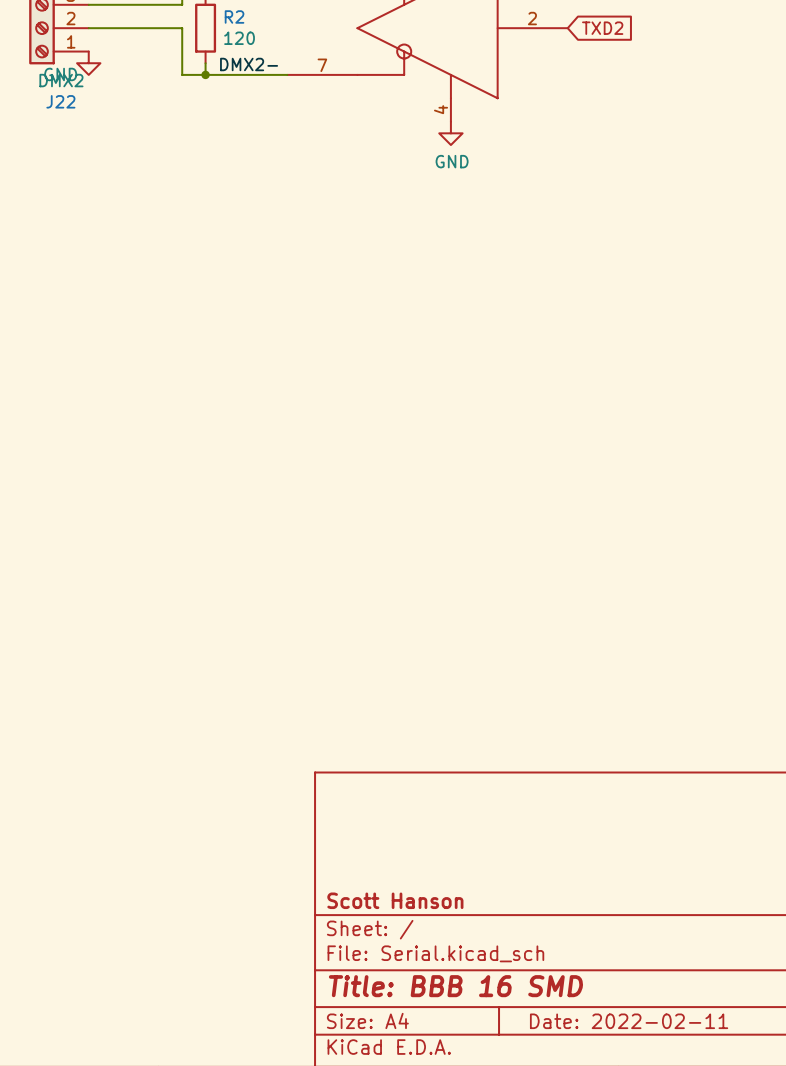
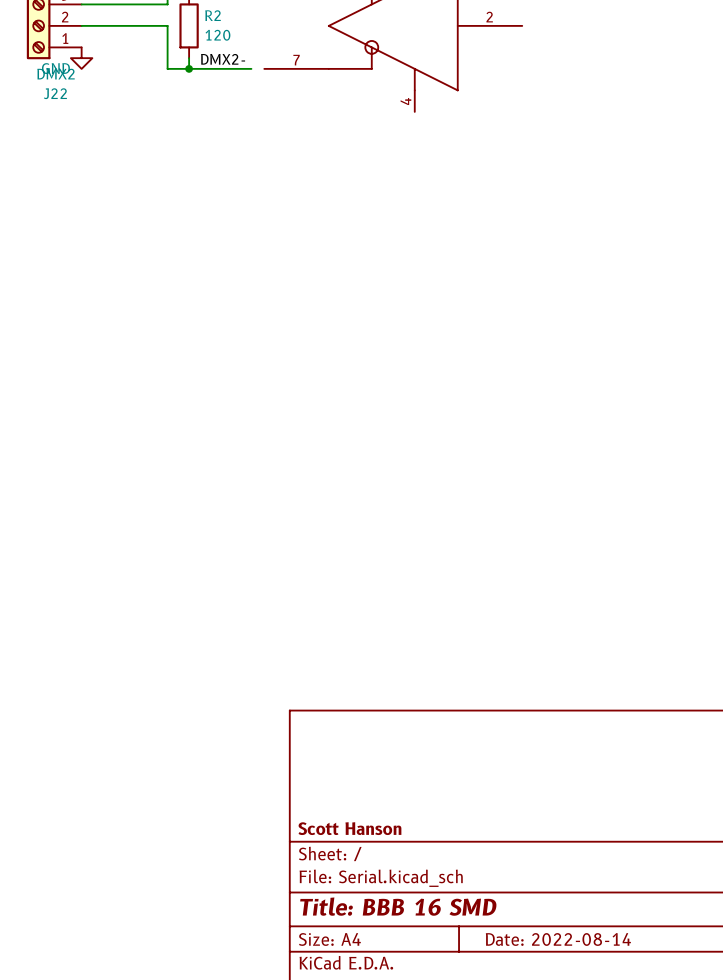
global label: TXD2 (602, 28) -> none
wire: (273, 74) (287, 74) -> none
power symbol: GND (450, 133) -> none
title block: Date: 2022-02-11 (629, 1021) -> Date: 2022-08-14 (558, 939)

